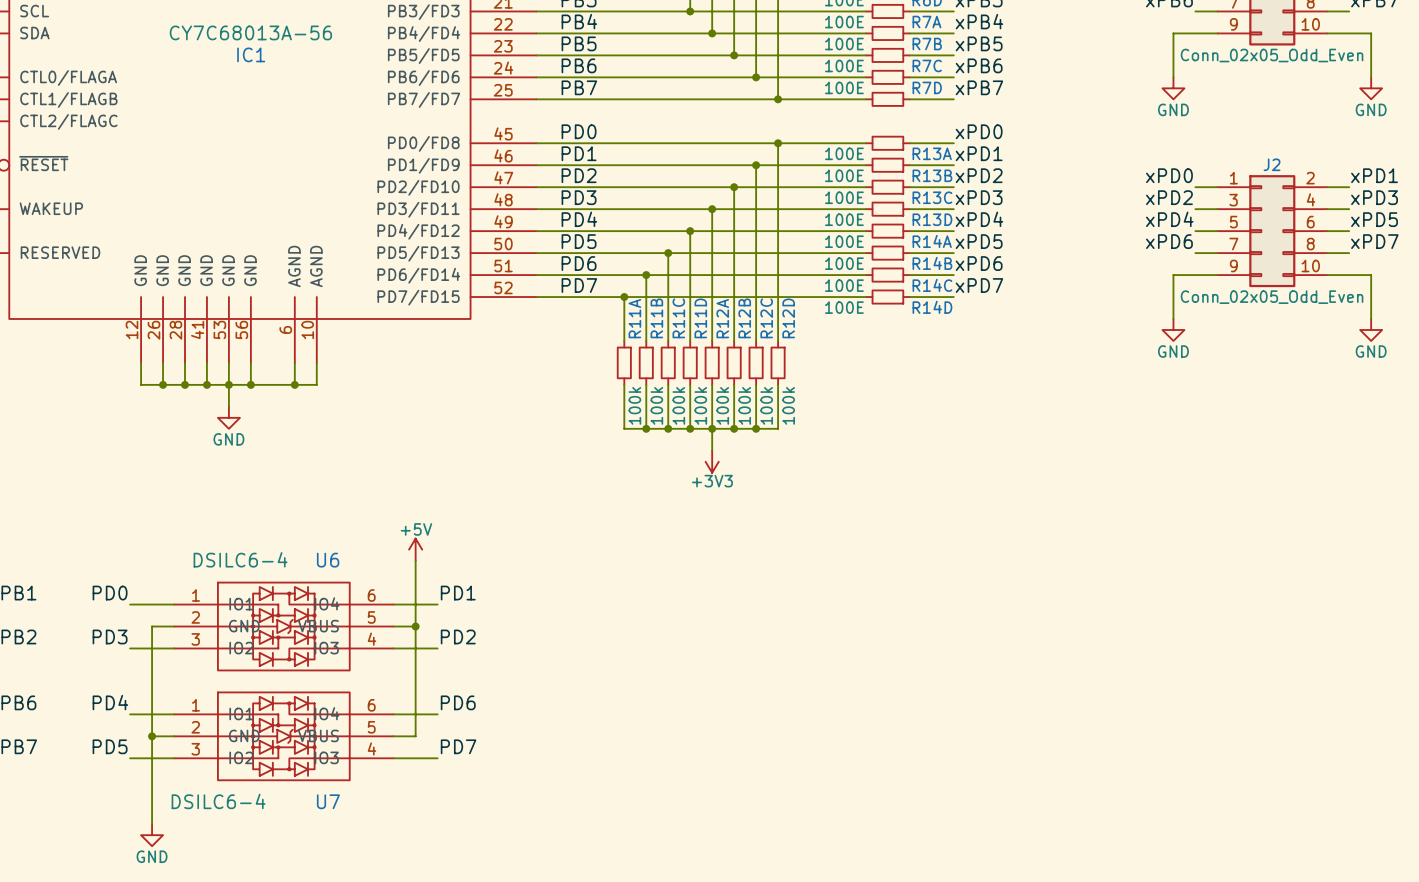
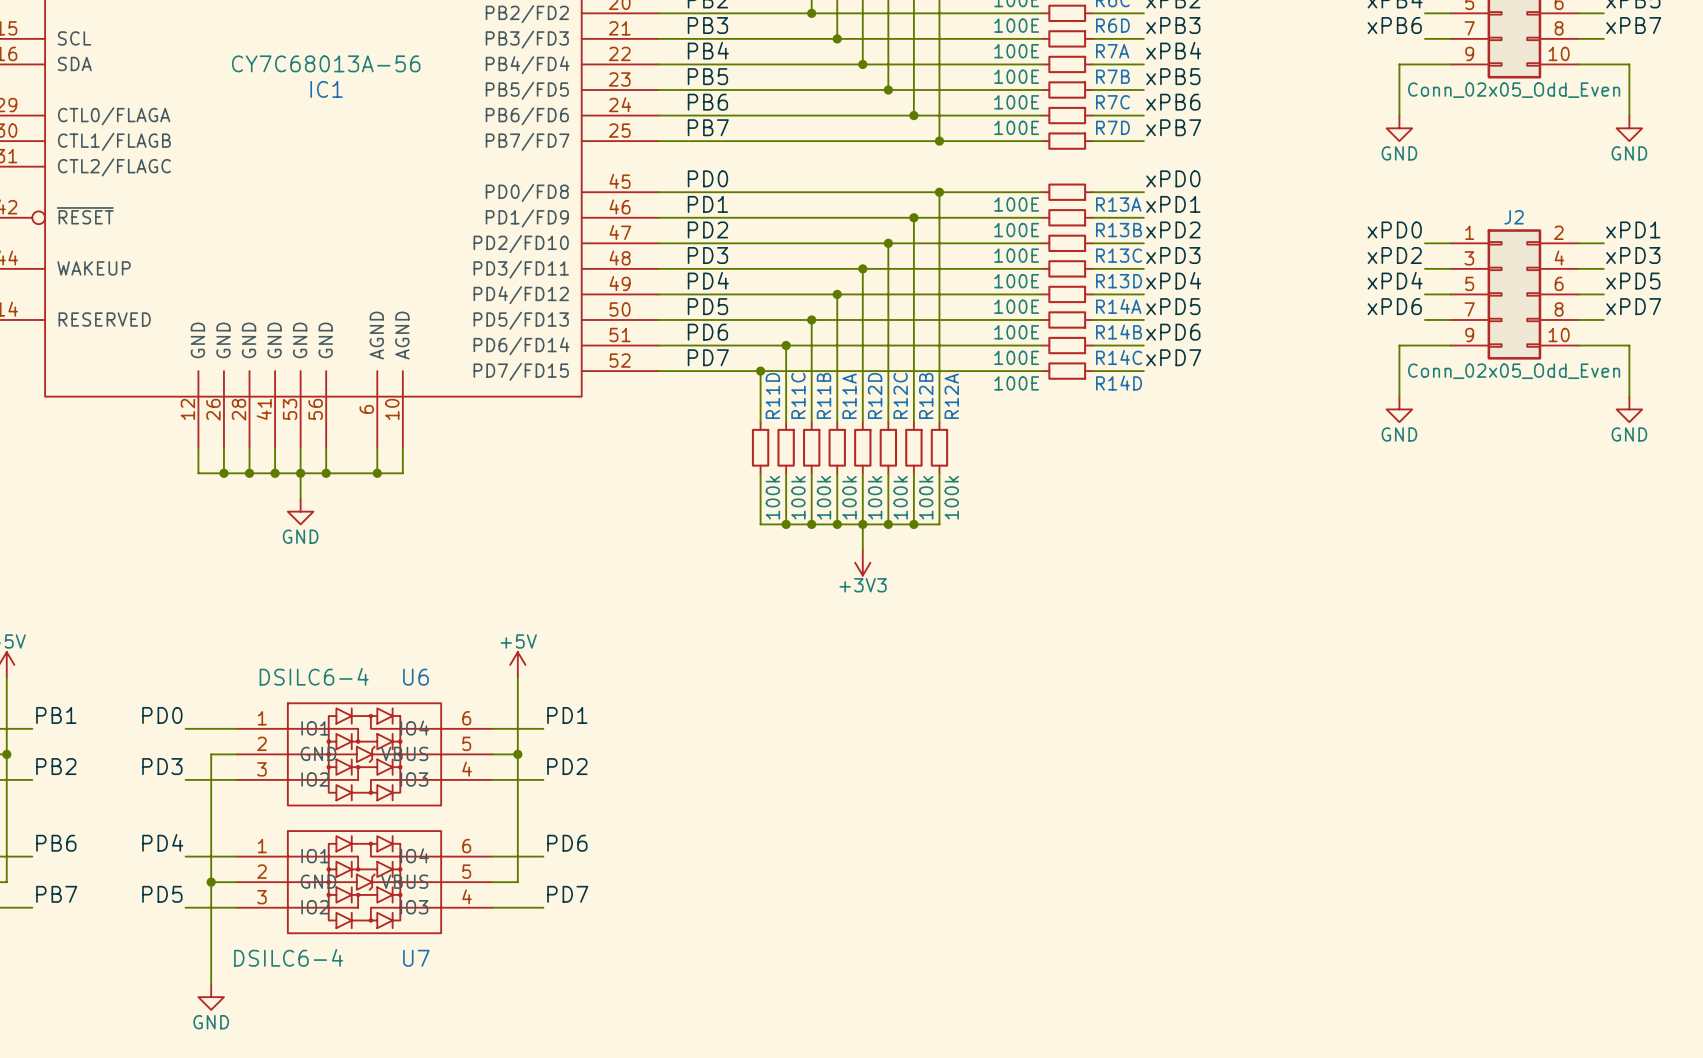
R11A name: R11A (634, 318) -> R11D (772, 395)
R11B name: R11B (656, 318) -> R11C (798, 395)
R11C name: R11C (678, 318) -> R11B (823, 395)
R11D name: R11D (700, 318) -> R11A (849, 396)
R12A name: R12A (722, 318) -> R12D (875, 395)
R12B name: R12B (744, 318) -> R12C (900, 395)
R12C name: R12C (766, 318) -> R12B (926, 395)
R12D name: R12D (788, 318) -> R12A (951, 396)

